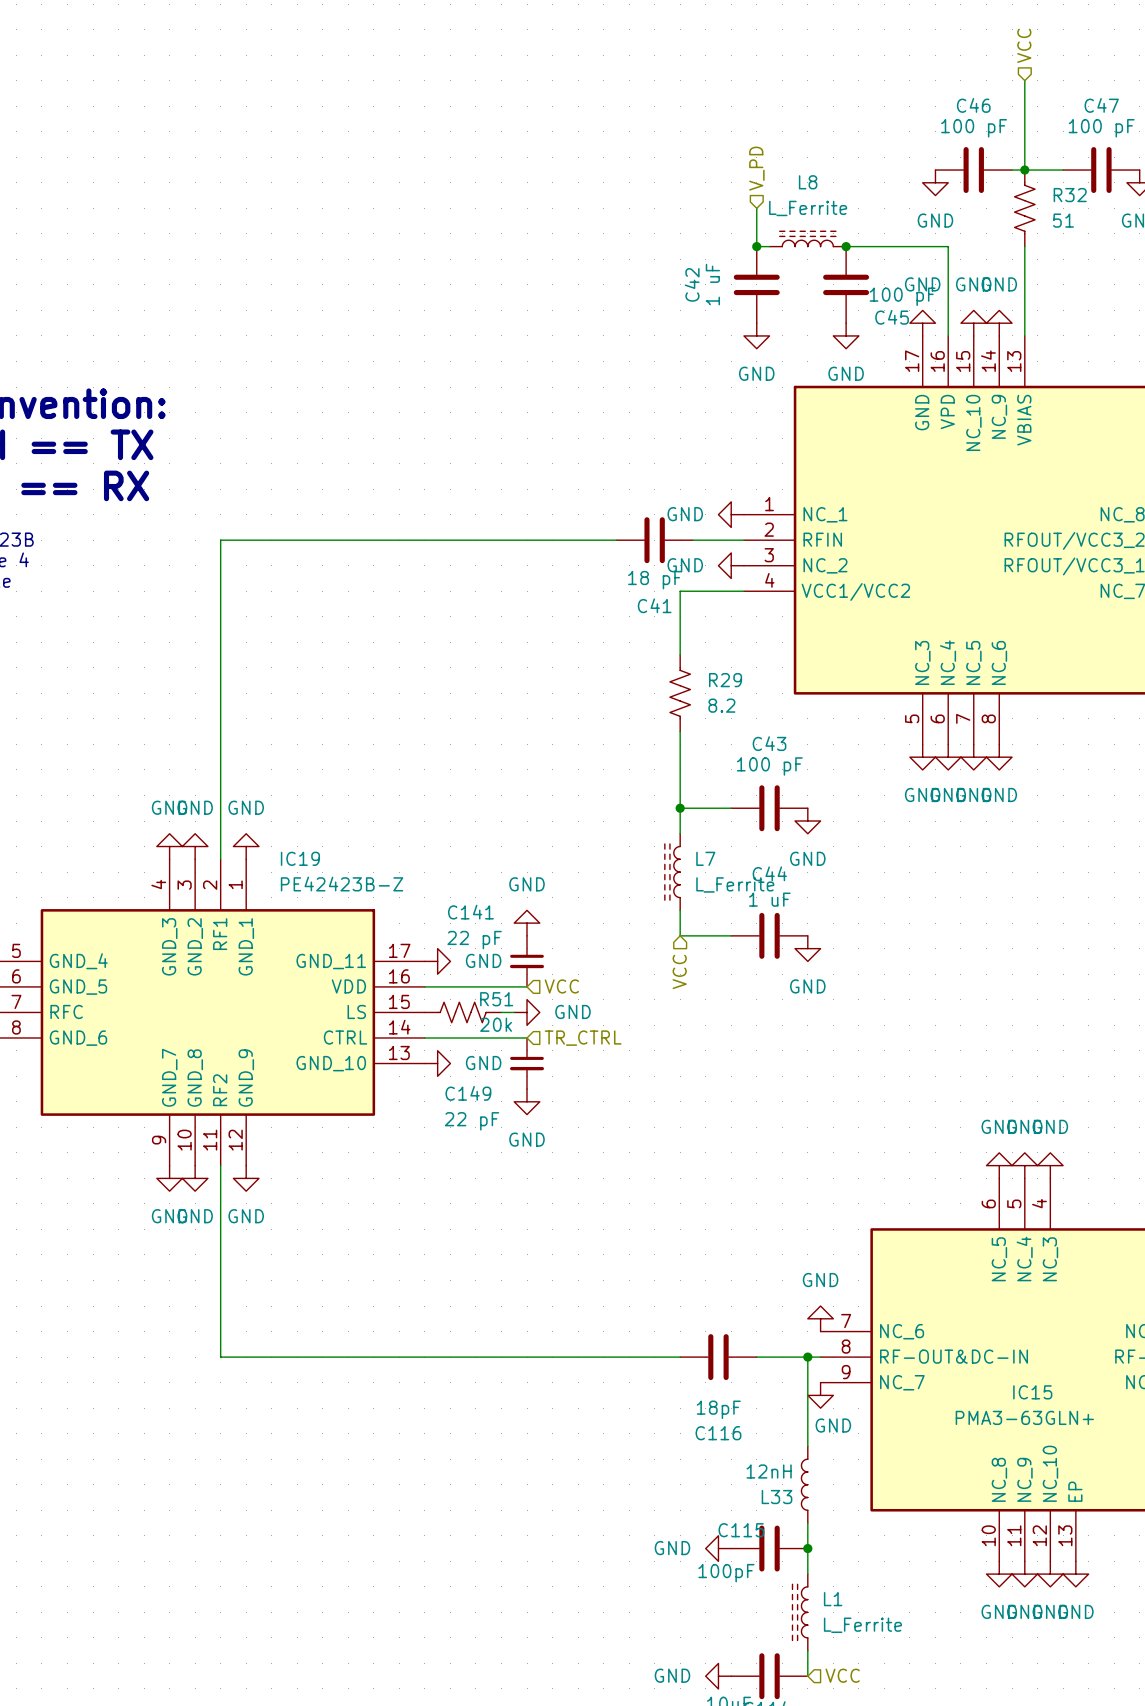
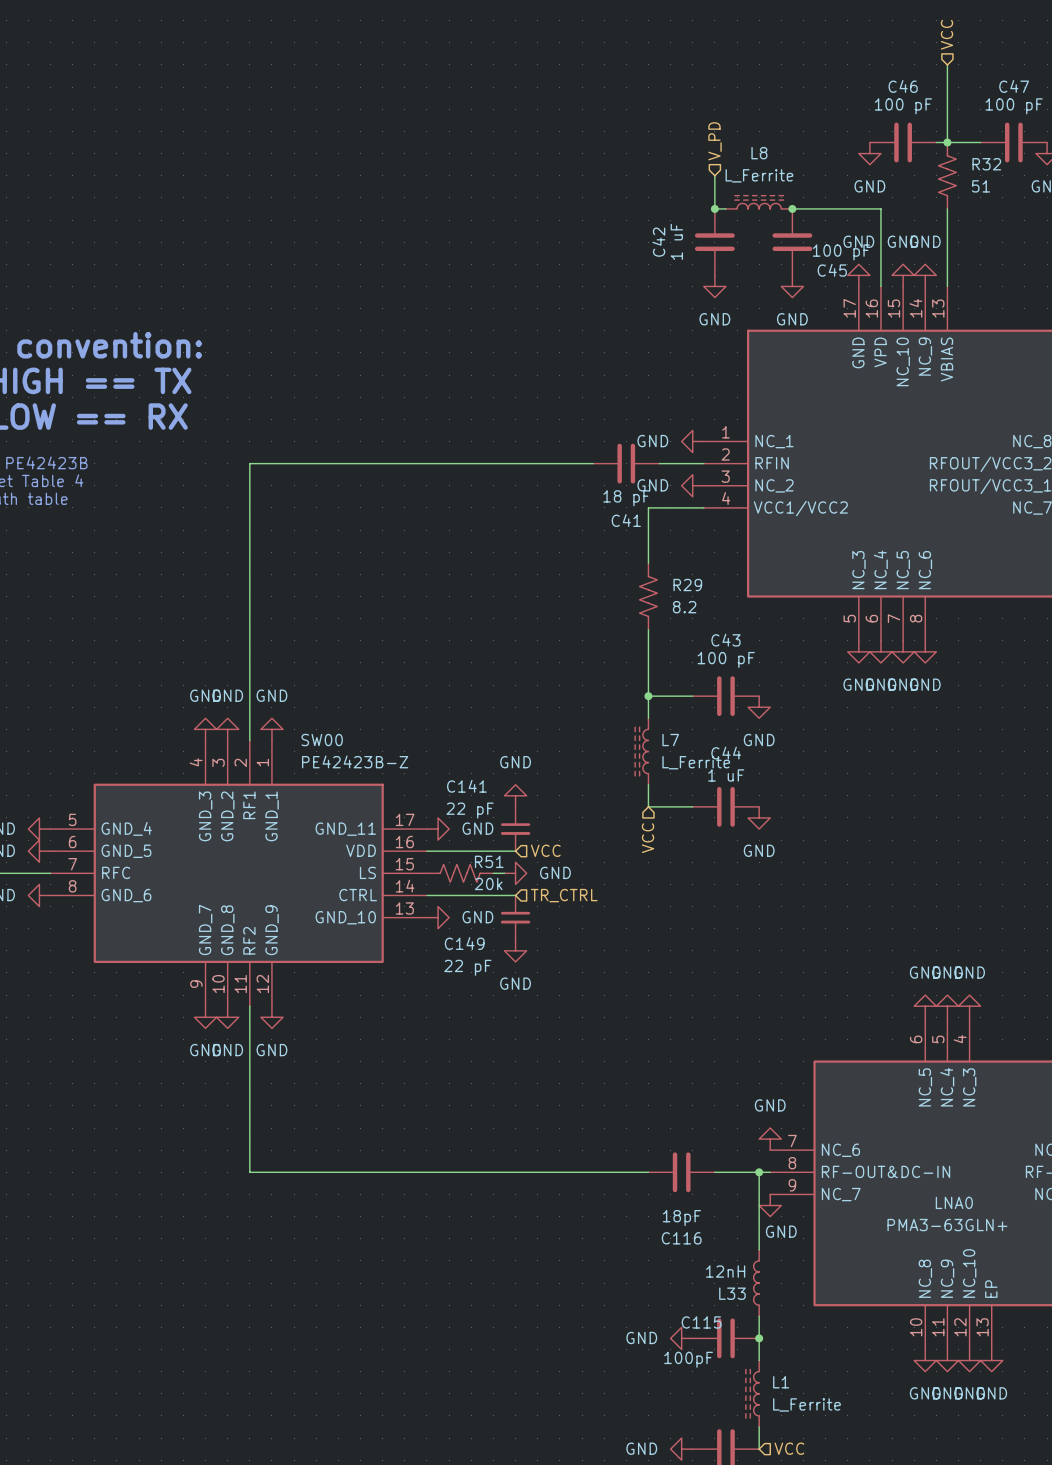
IC19 name: IC19 (300, 858) -> SW00 (322, 740)
IC15 name: IC15 (1032, 1392) -> LNA0 (954, 1202)

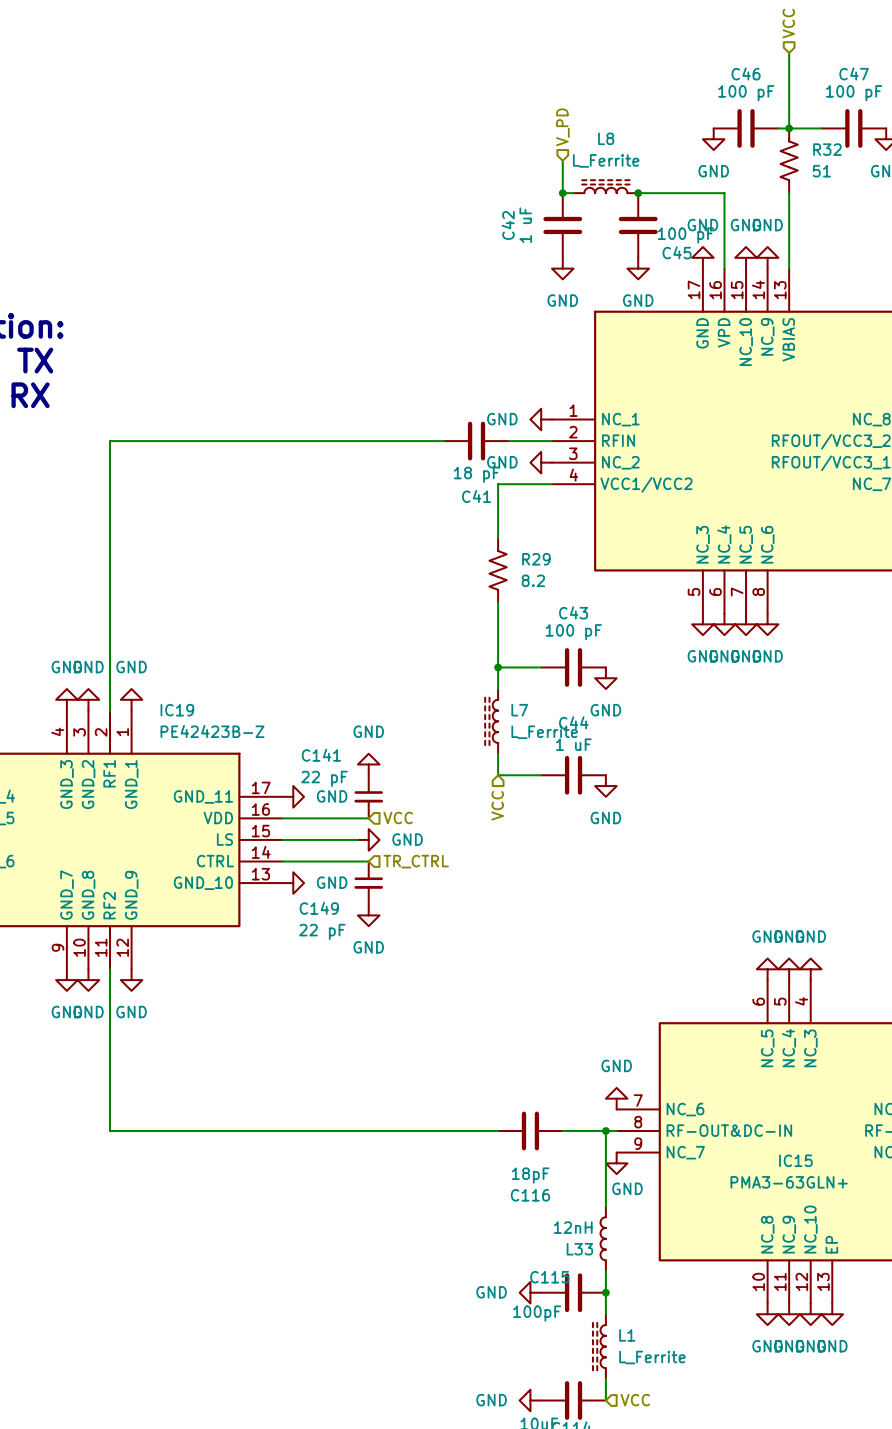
SW00 name: SW00 (322, 740) -> IC19 (177, 710)
R51: 20k (460, 873) -> none
LNA0 name: LNA0 (954, 1202) -> IC15 (795, 1160)

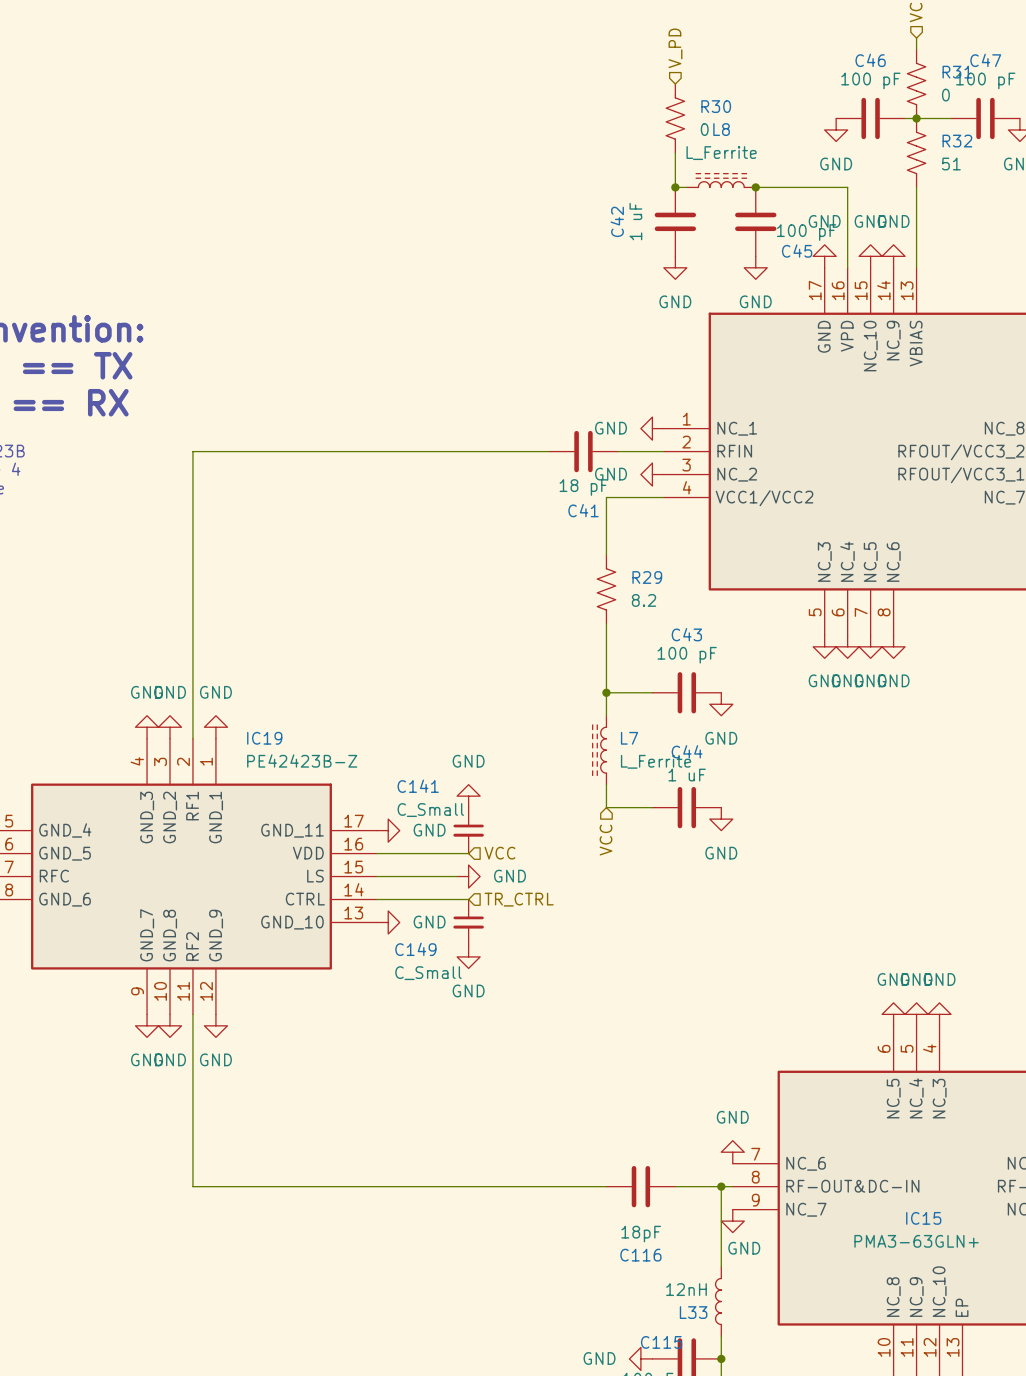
R31: none -> 0 (916, 84)
hierarchical label position: V_PD (562, 127) -> V_PD (675, 48)
R30: none -> 0 (675, 118)
C141 value: 22 pF (324, 778) -> C_Small (430, 810)
C149 value: 22 pF (322, 931) -> C_Small (428, 973)

